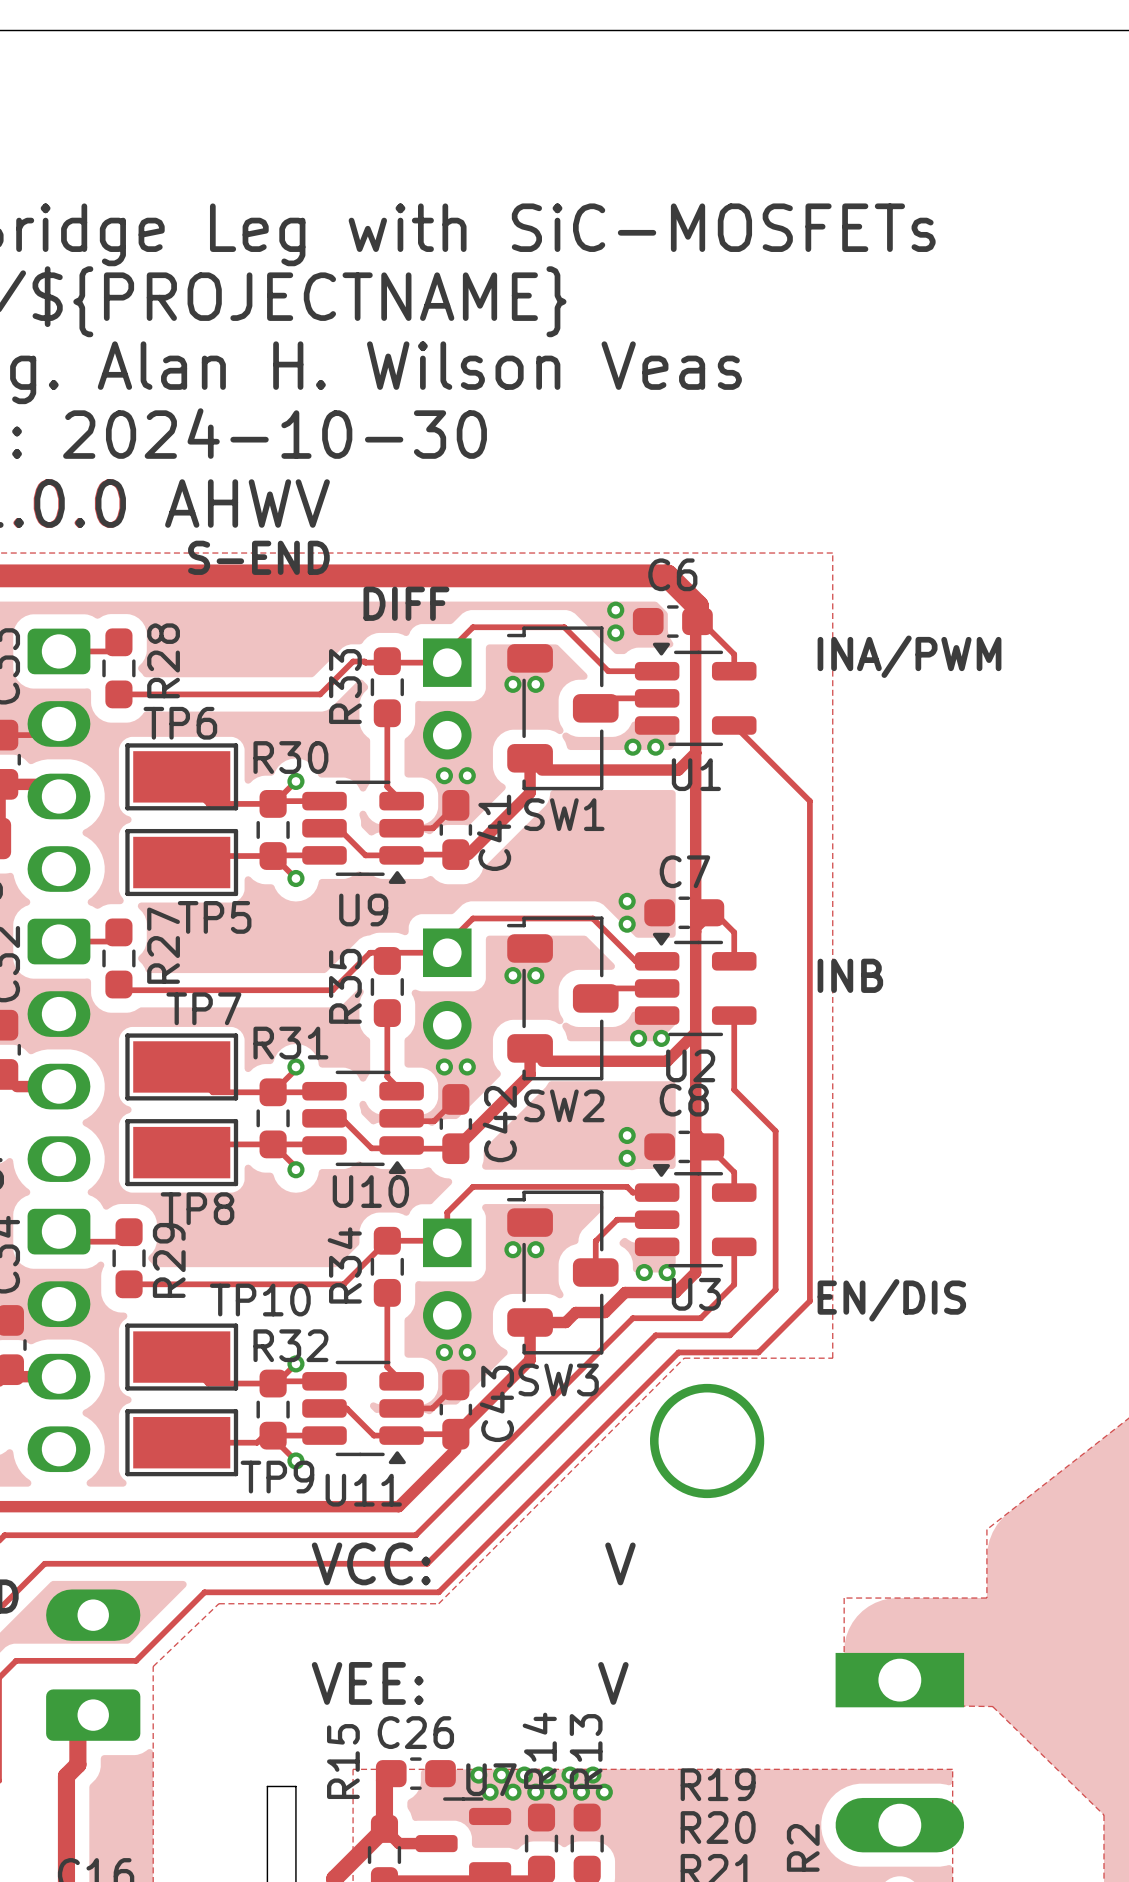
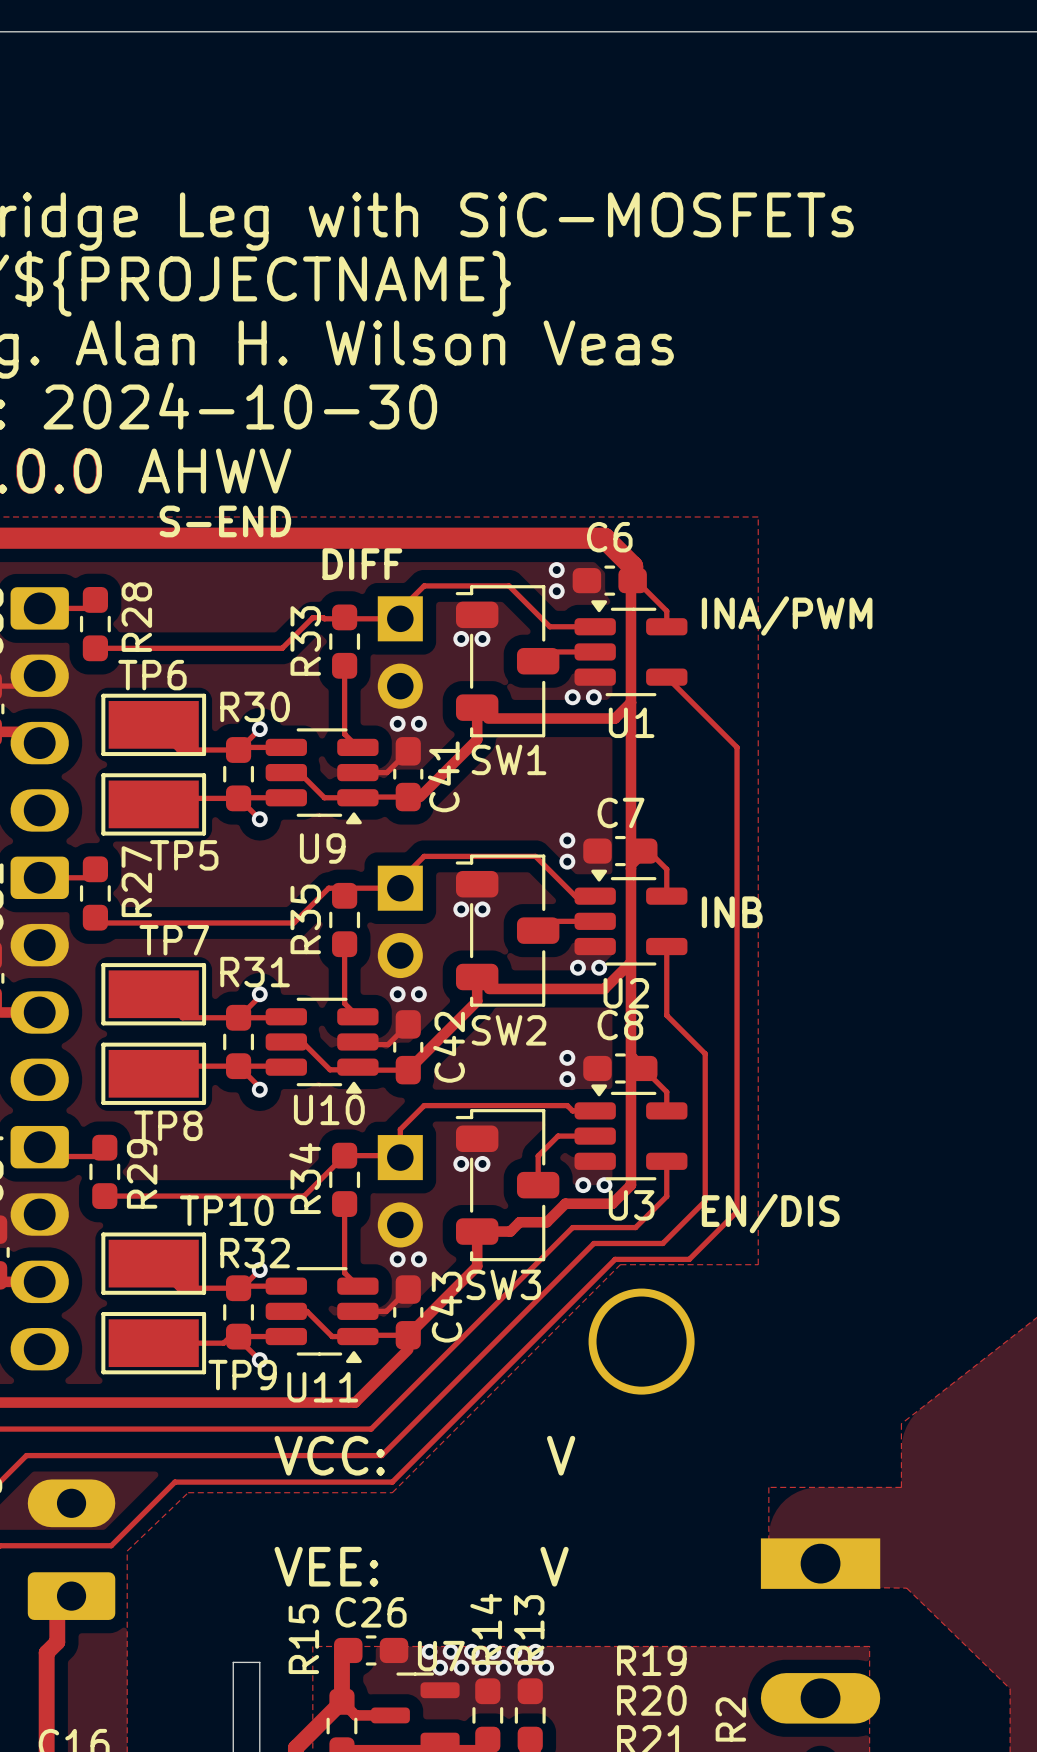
text position: INA/PWM (909, 656) -> INA/PWM (787, 615)
text position: INB (850, 975) -> INB (732, 912)
text position: EN/DIS (891, 1300) -> EN/DIS (770, 1213)

